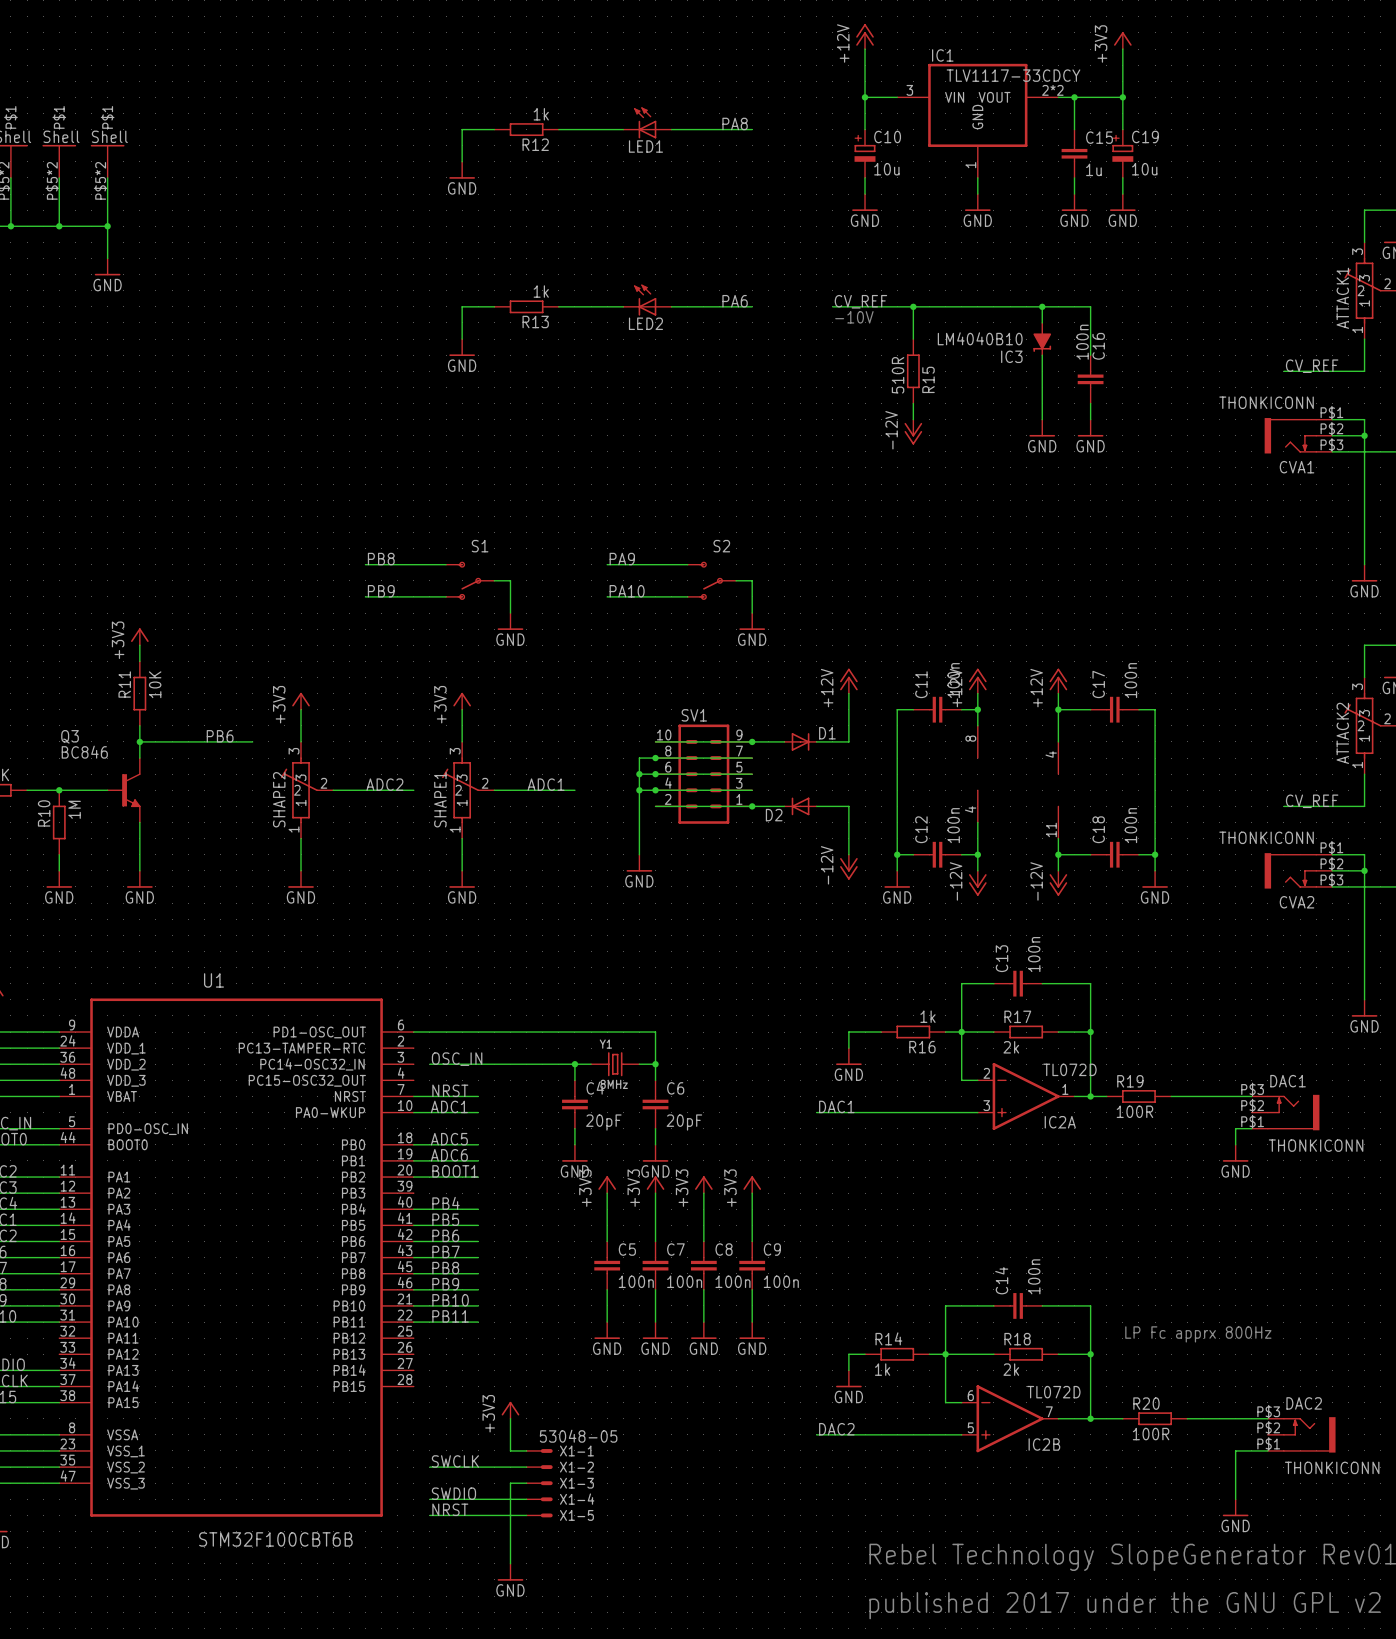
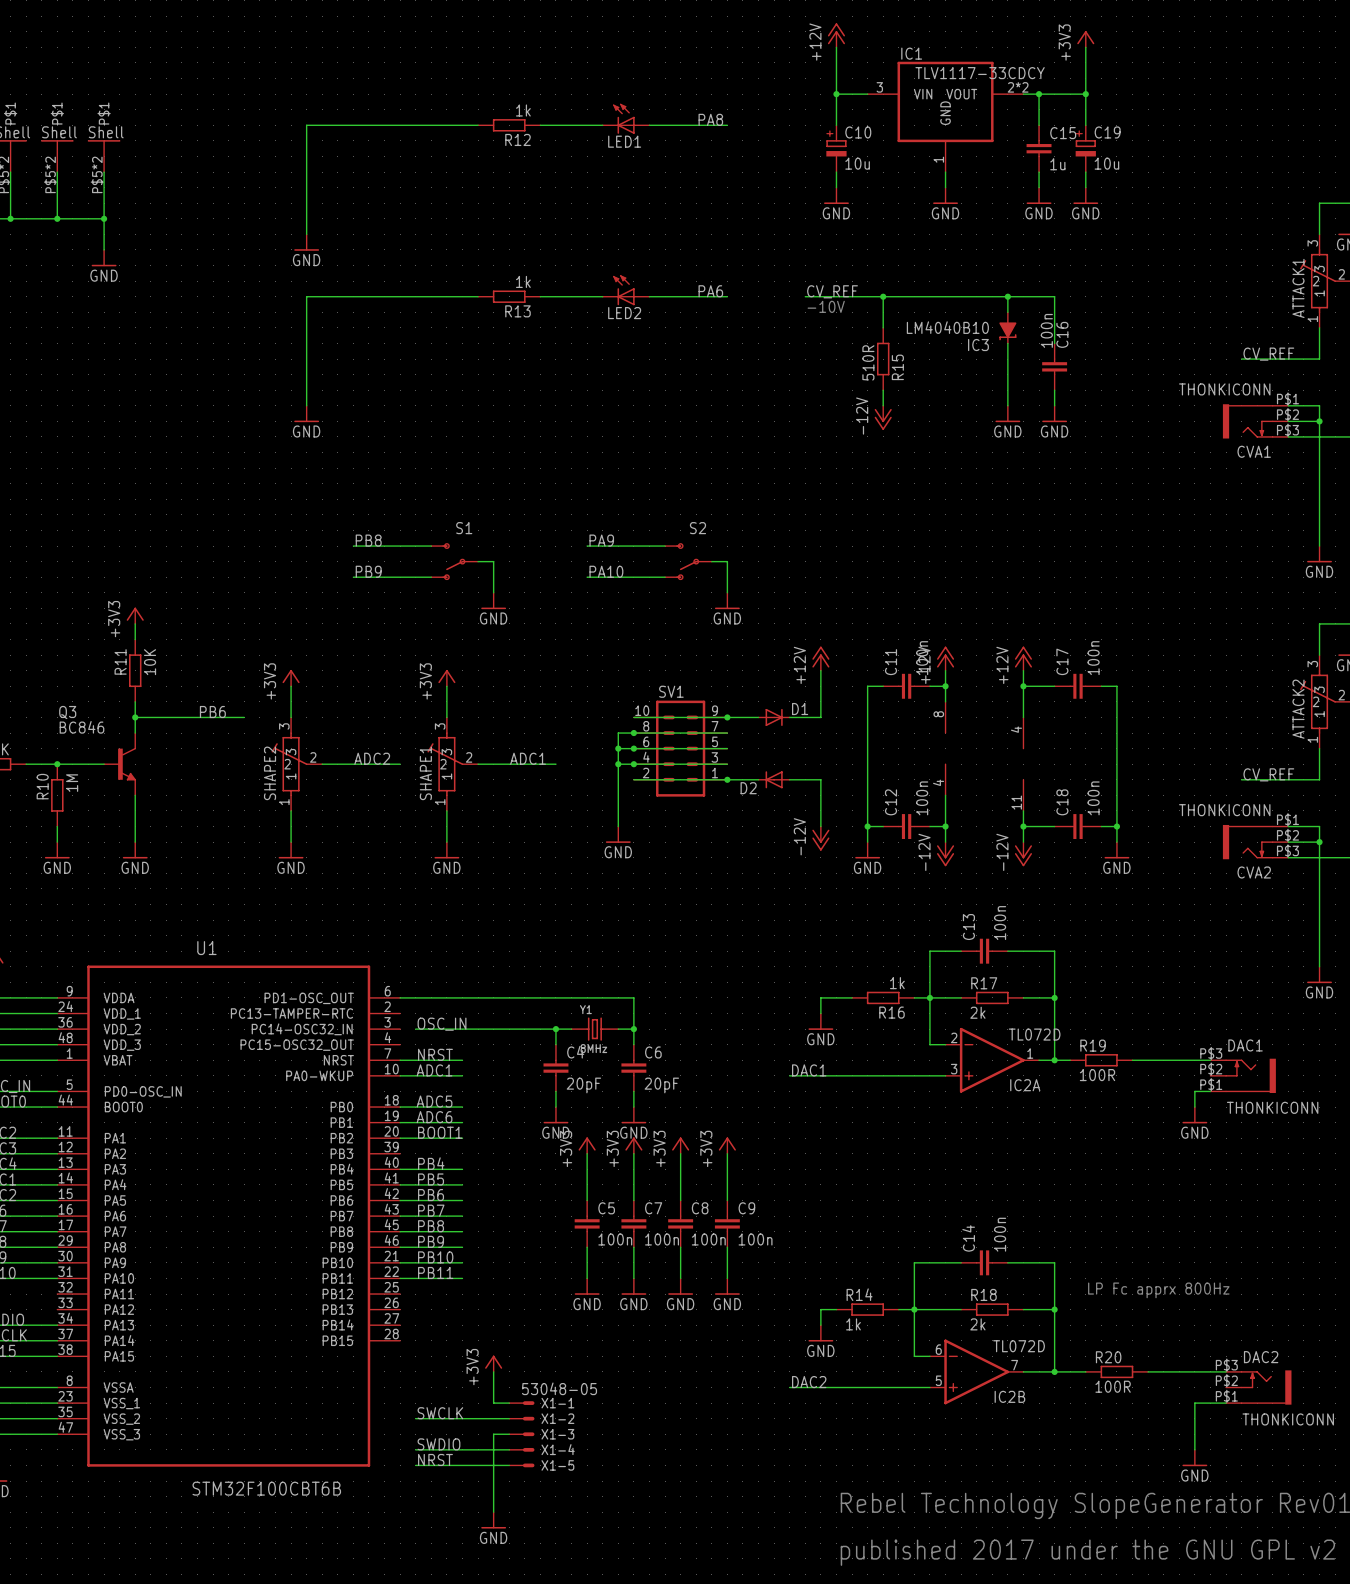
wire: (462, 129) (462, 161) -> (446, 125) (306, 125) (306, 234)
power symbol: GND (462, 170) -> none
power symbol: none -> GND (306, 242)
wire: (462, 306) (462, 339) -> (446, 296) (306, 296) (306, 405)
power symbol: GND (462, 347) -> none
power symbol: none -> GND (306, 413)

